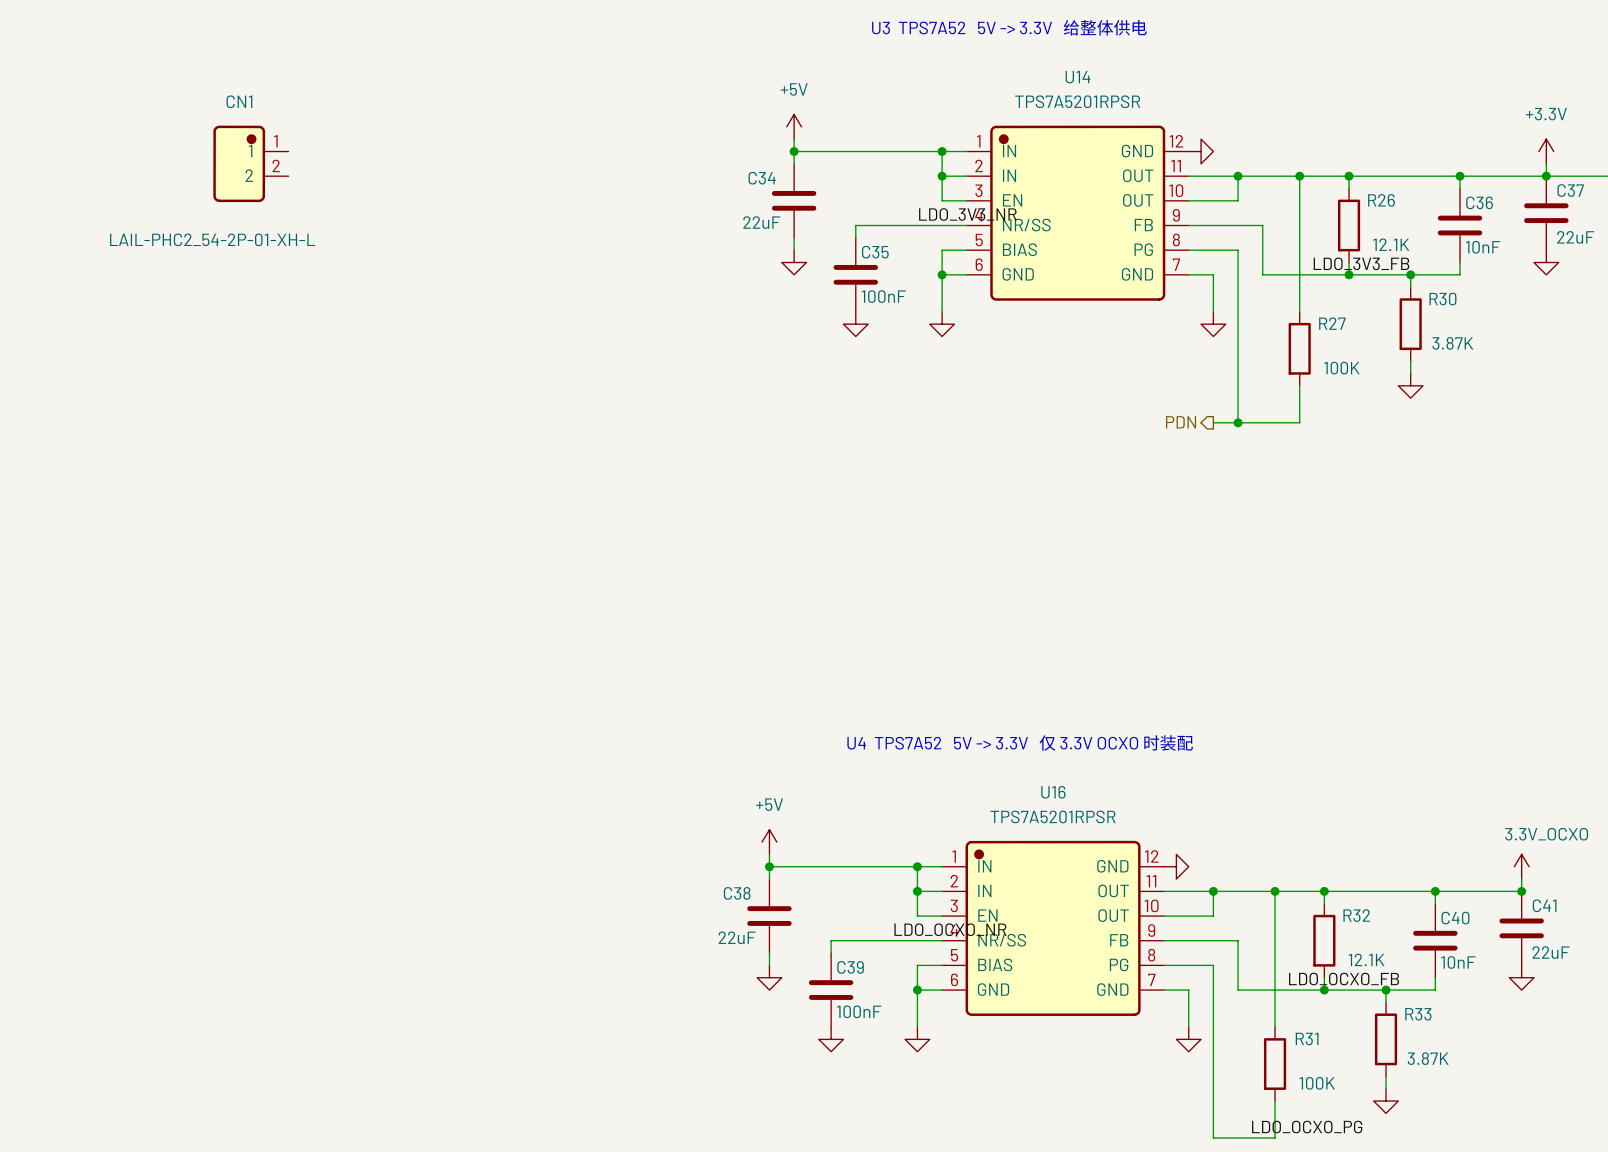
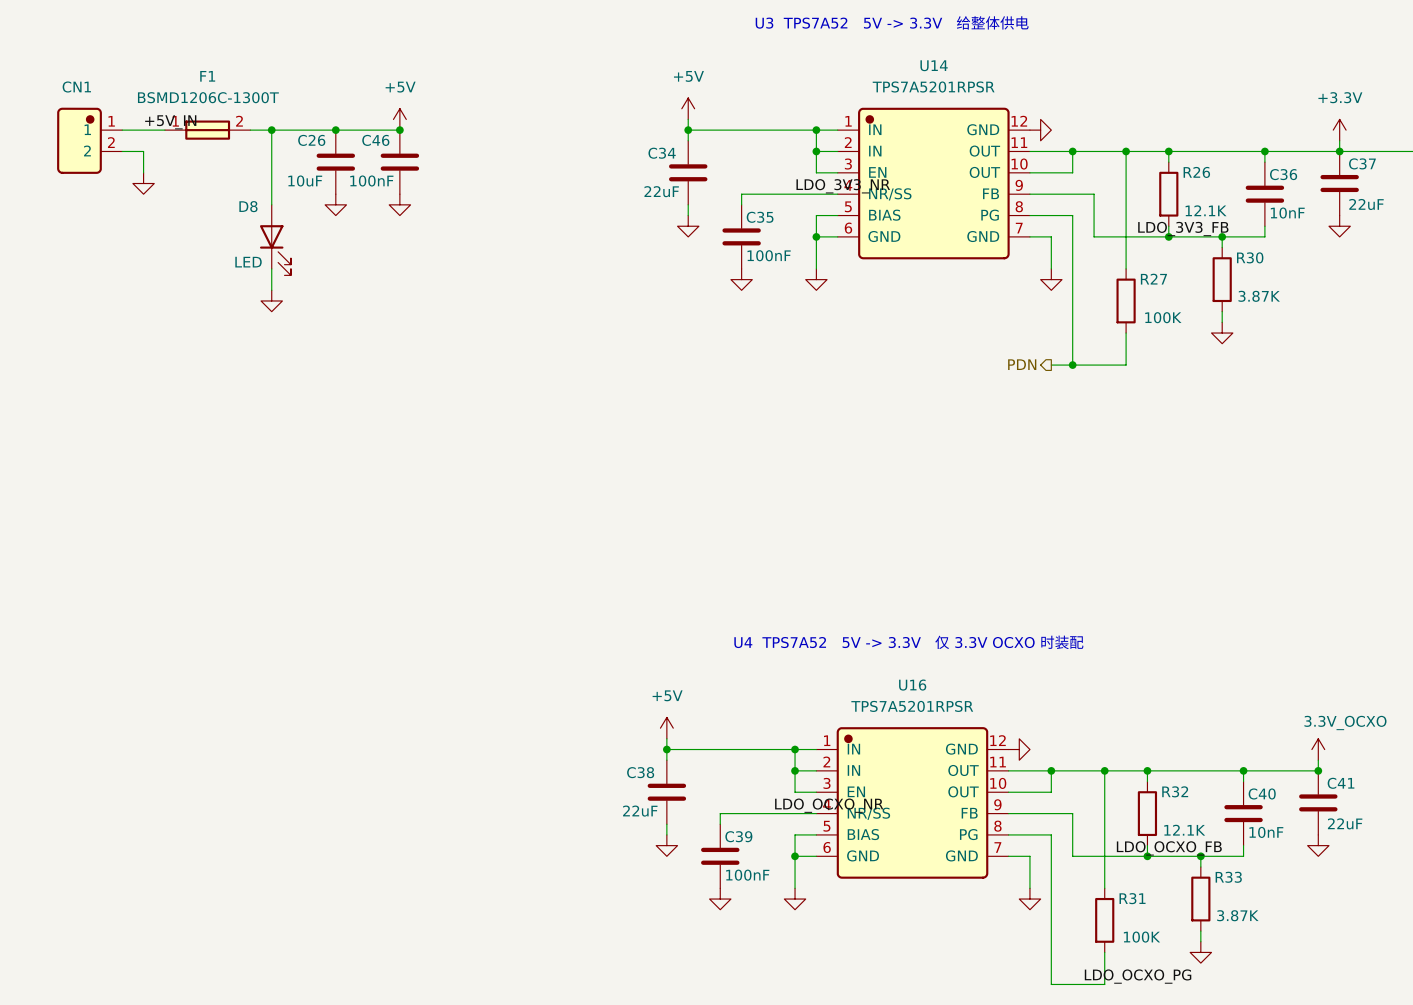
power symbol: none -> +5V (399, 119)
label: none -> +5V_IN (170, 122)
wire: none -> (122, 130) (164, 130)
F1: none -> BSMD1206C-1300T (207, 130)
wire: none -> (250, 130) (399, 130)
wire: none -> (271, 130) (271, 204)
junction: none -> (271, 130)
junction: none -> (335, 130)
junction: none -> (399, 130)
CN1 position: (250, 163) -> (89, 140)
wire: none -> (122, 151) (143, 151) (143, 172)
C26: none -> 10uF (335, 162)
C46: none -> 100nF (399, 162)
power symbol: none -> (143, 183)
power symbol: none -> (335, 204)
power symbol: none -> (399, 204)
CN1 value: LAIL-PHC2_54-2P-01-XH-L (212, 239) -> none
D8: none -> LED (275, 240)
wire: none -> (271, 268) (271, 290)
power symbol: none -> (271, 300)

